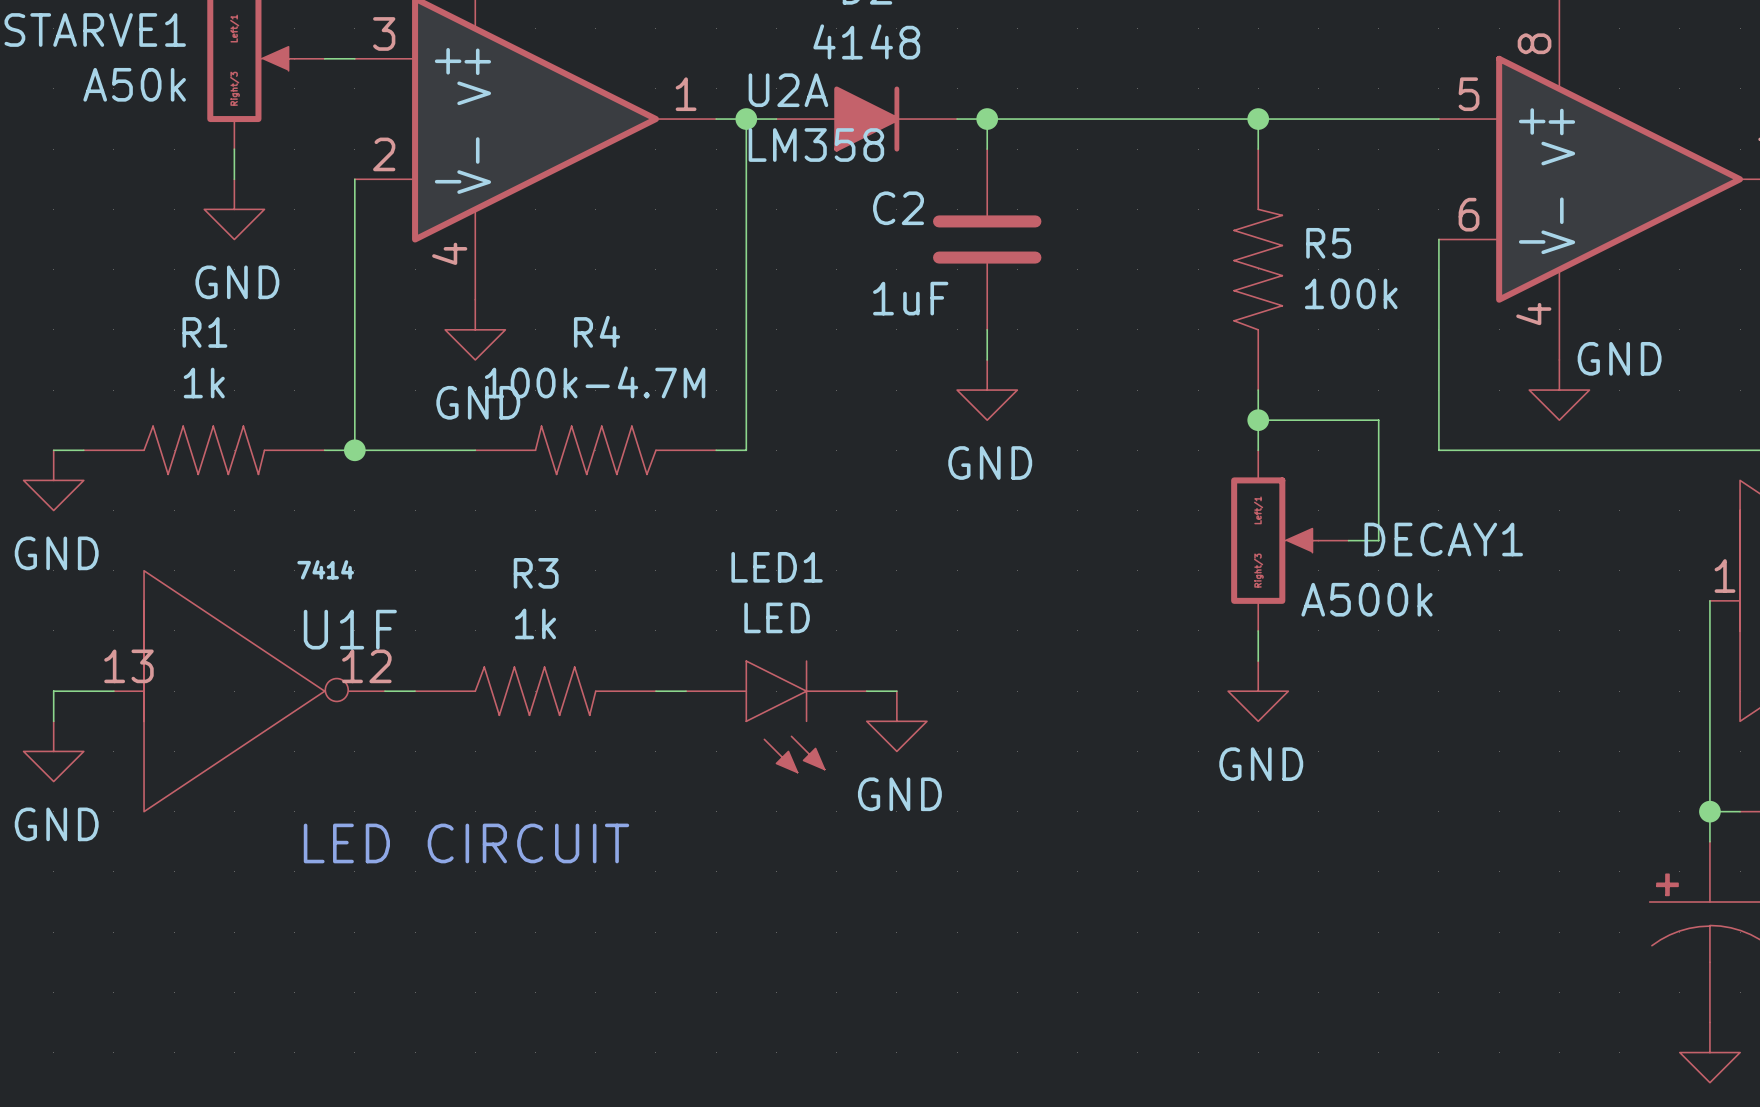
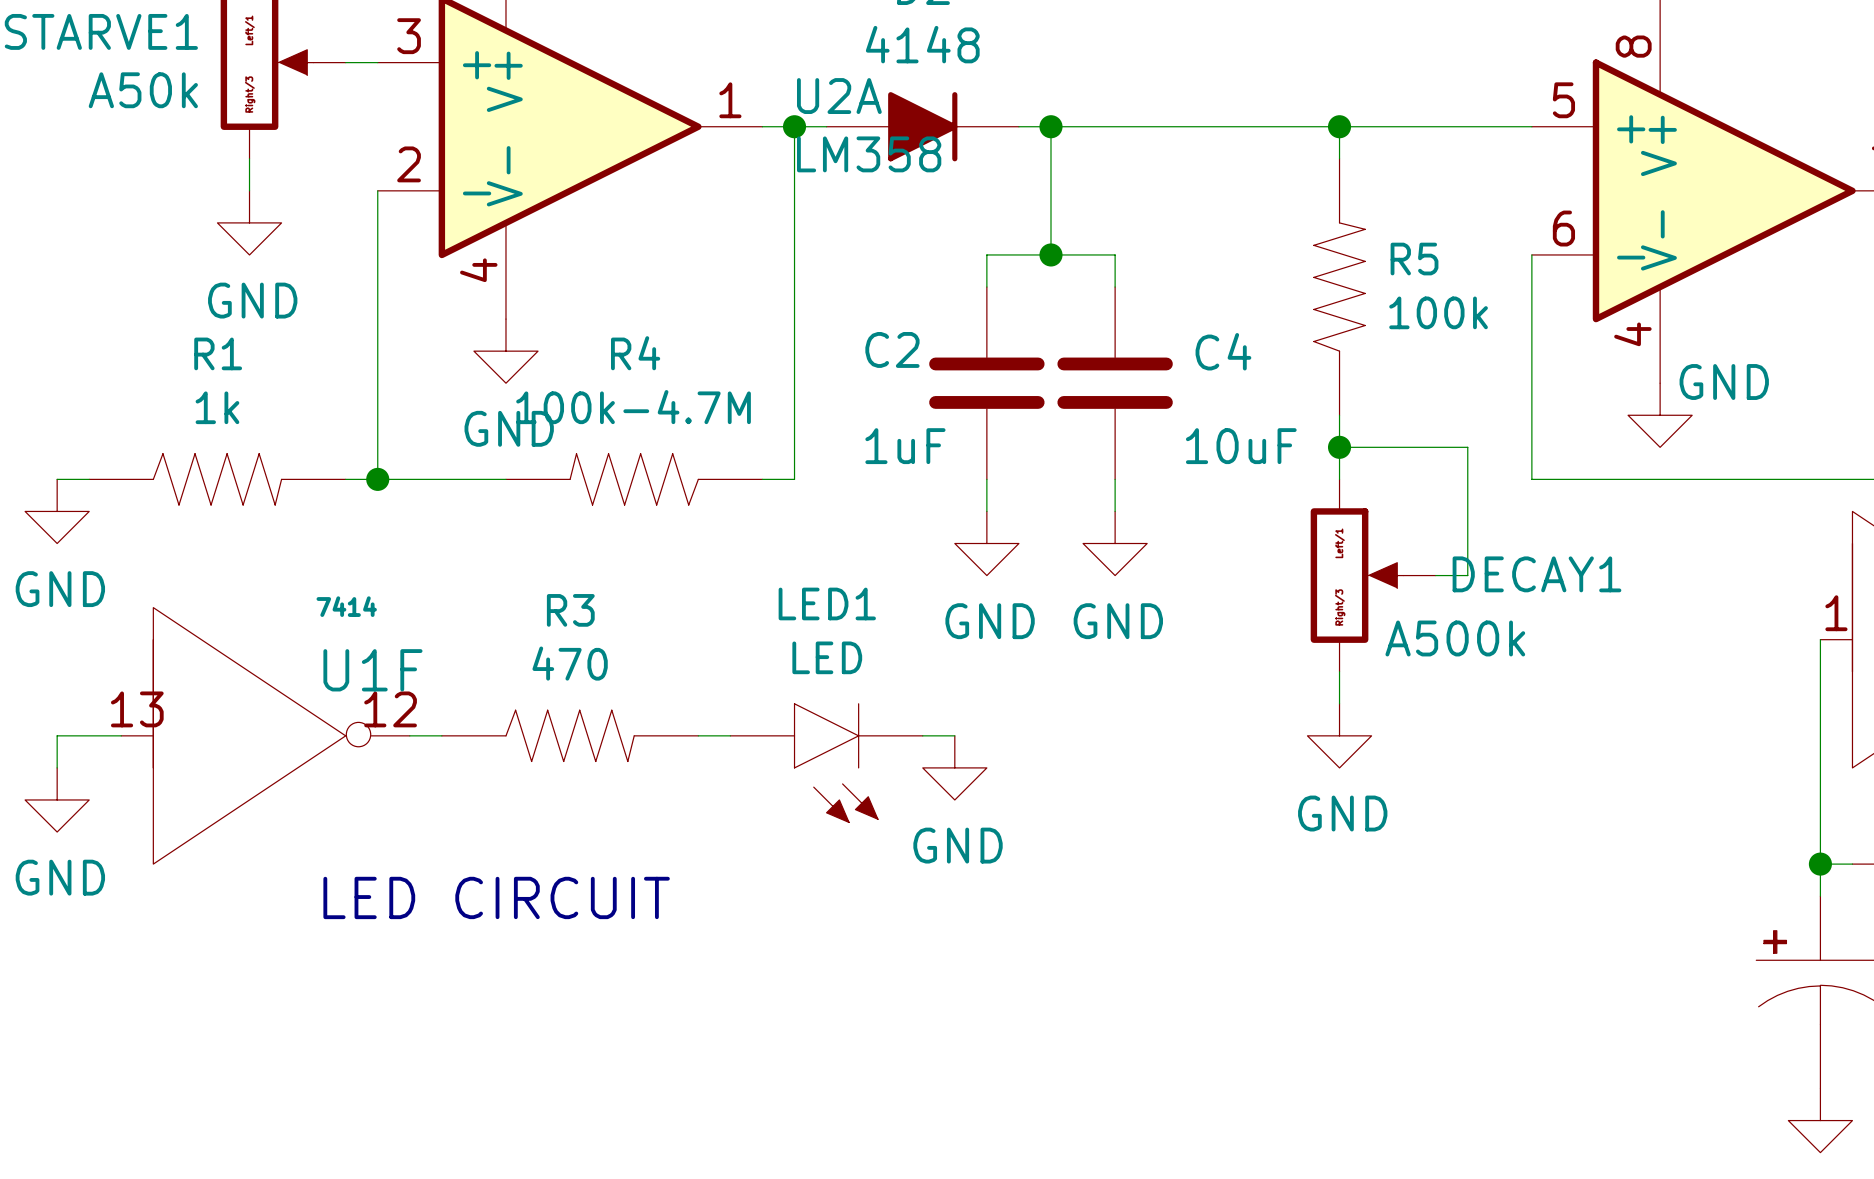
C2 position: (987, 239) -> (986, 383)
junction: none -> (1050, 254)
wire: none -> (986, 287) (986, 254) (1115, 254) (1115, 287)
wire: (987, 329) (987, 359) -> (986, 479) (986, 511)
C4: none -> 10uF (1115, 383)
power symbol: GND (987, 390) -> none
wire: none -> (1115, 479) (1115, 511)
power symbol: none -> GND (986, 543)
power symbol: none -> GND (1115, 543)
R3 value: 1k (535, 623) -> 470 (570, 663)

